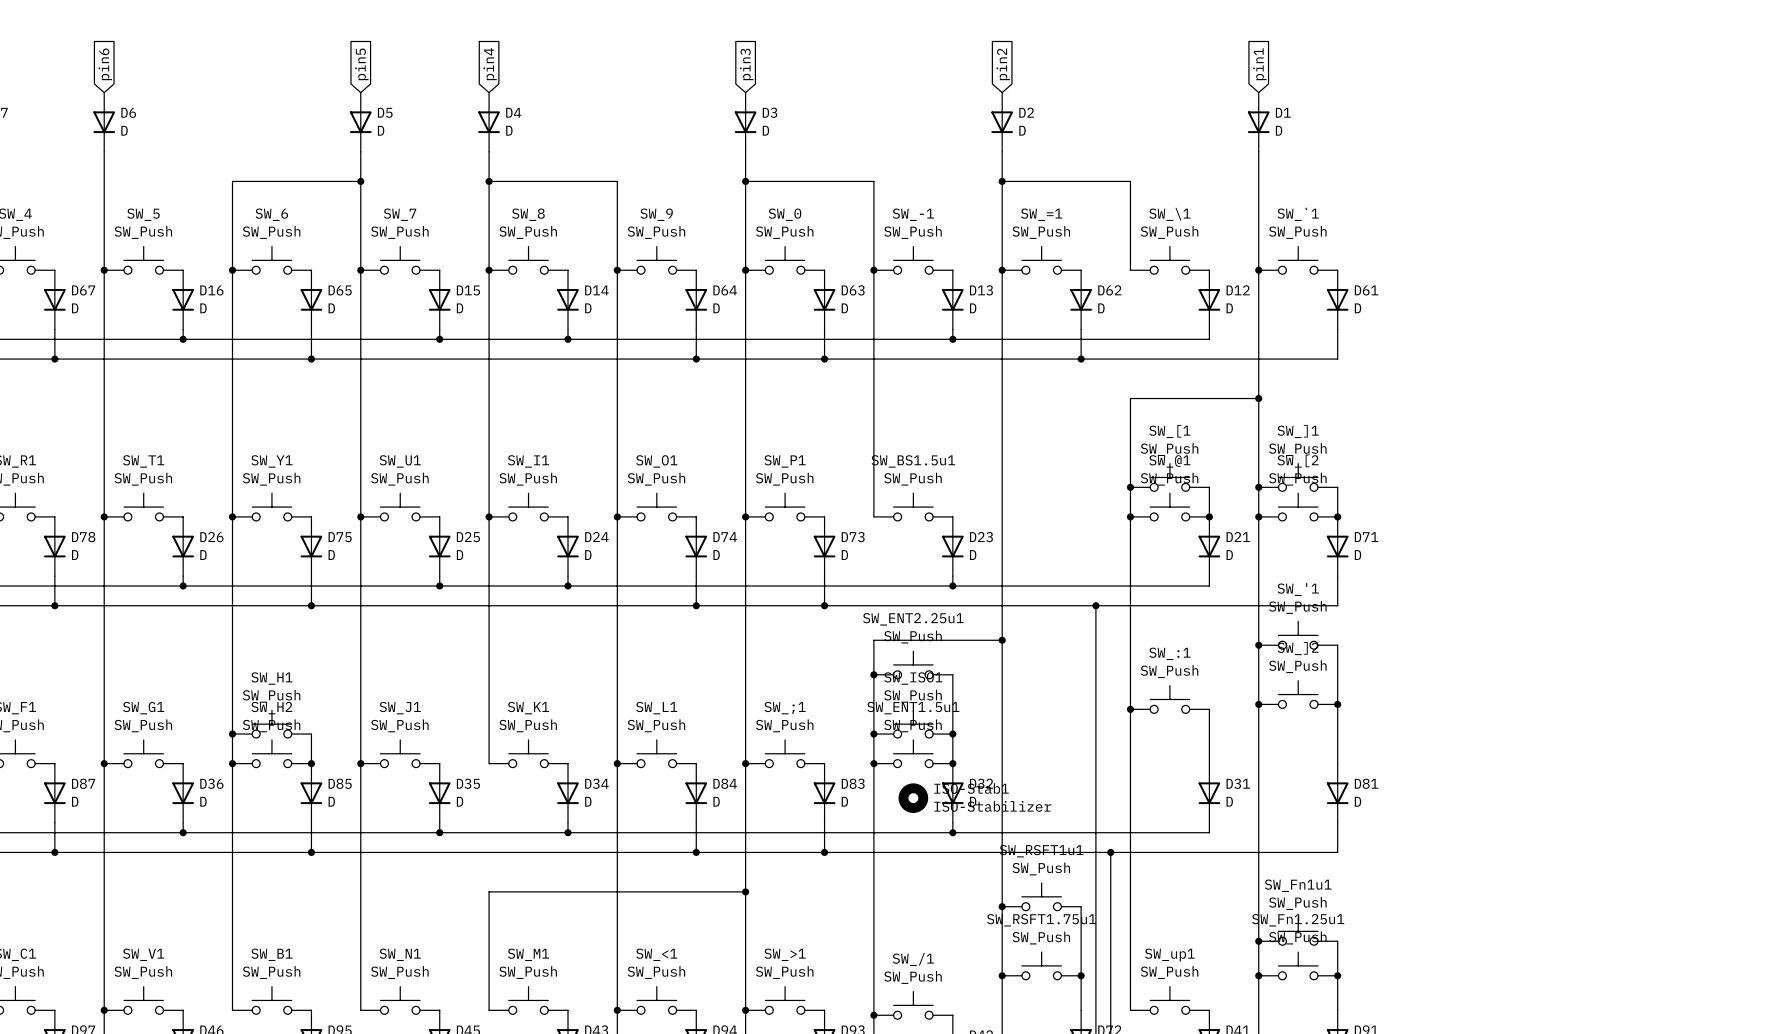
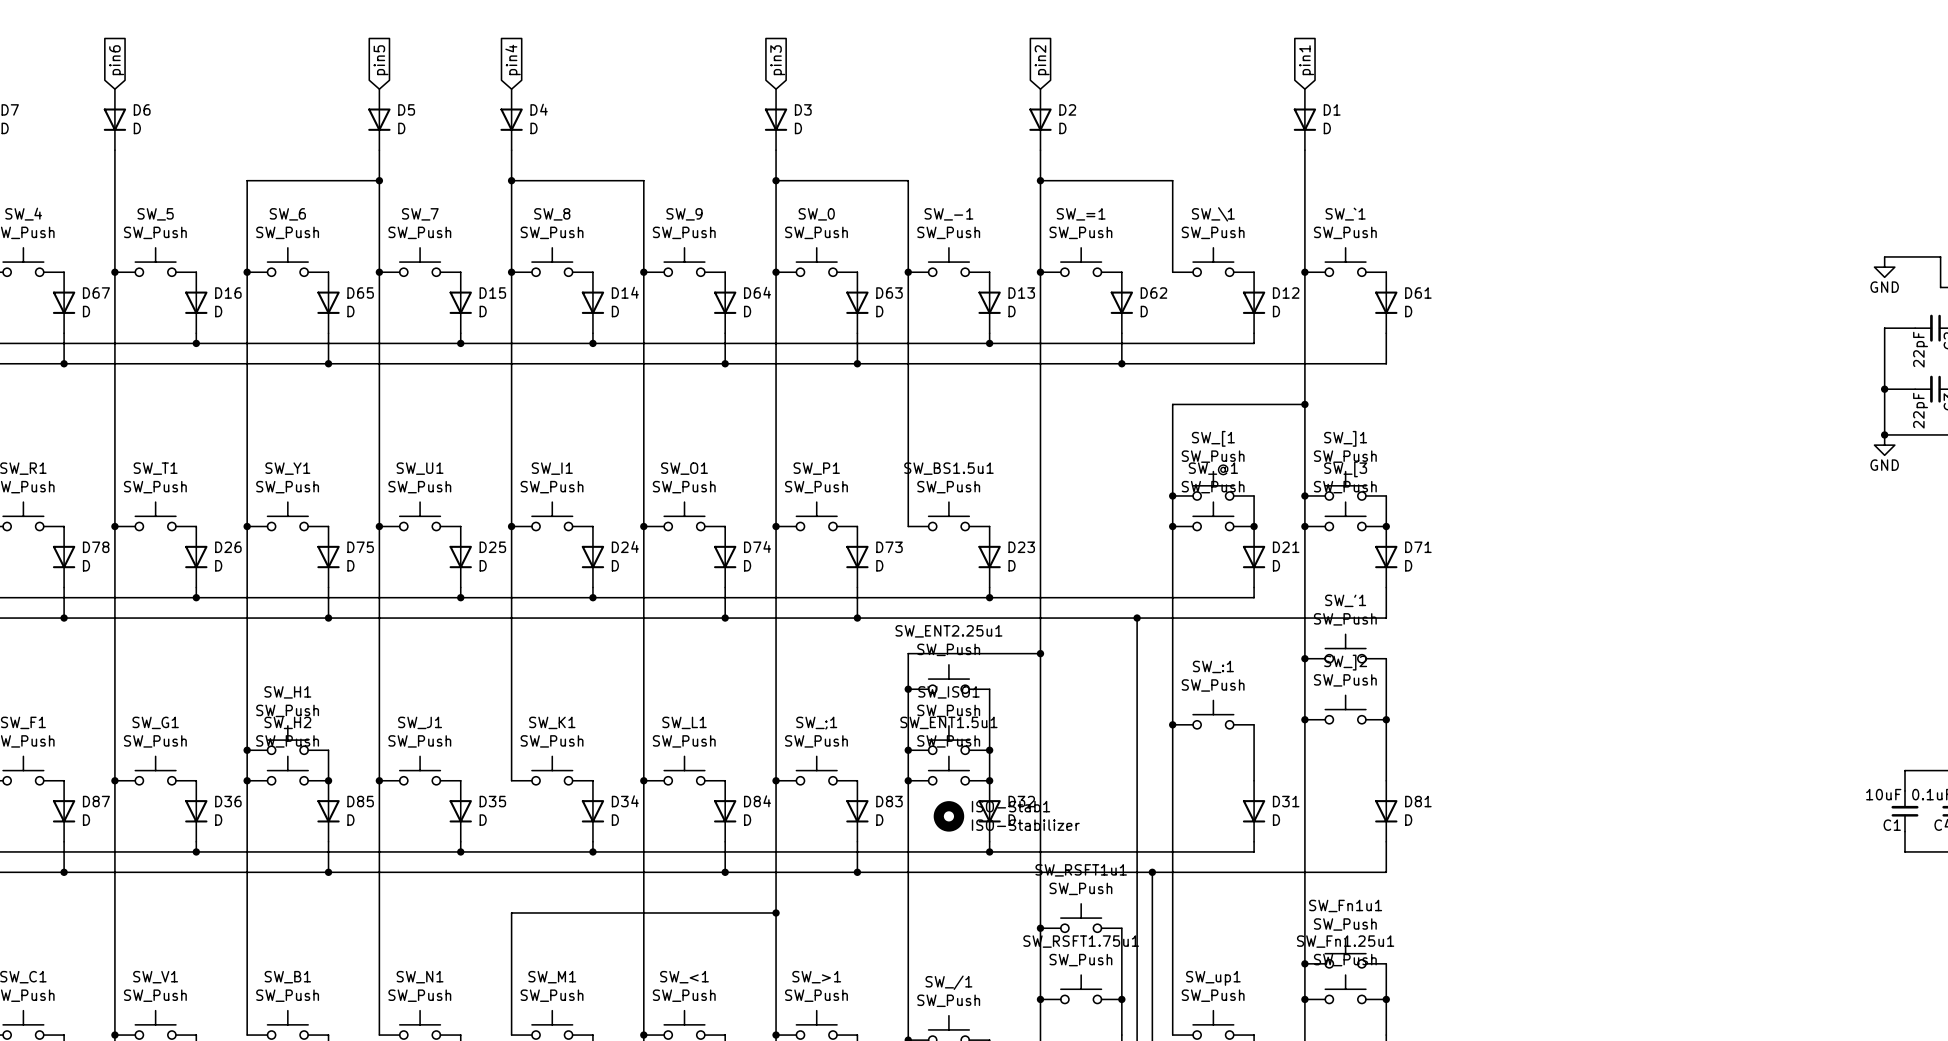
SW_[2 name: SW_[2 (1298, 461) -> SW_[3 (1345, 469)

